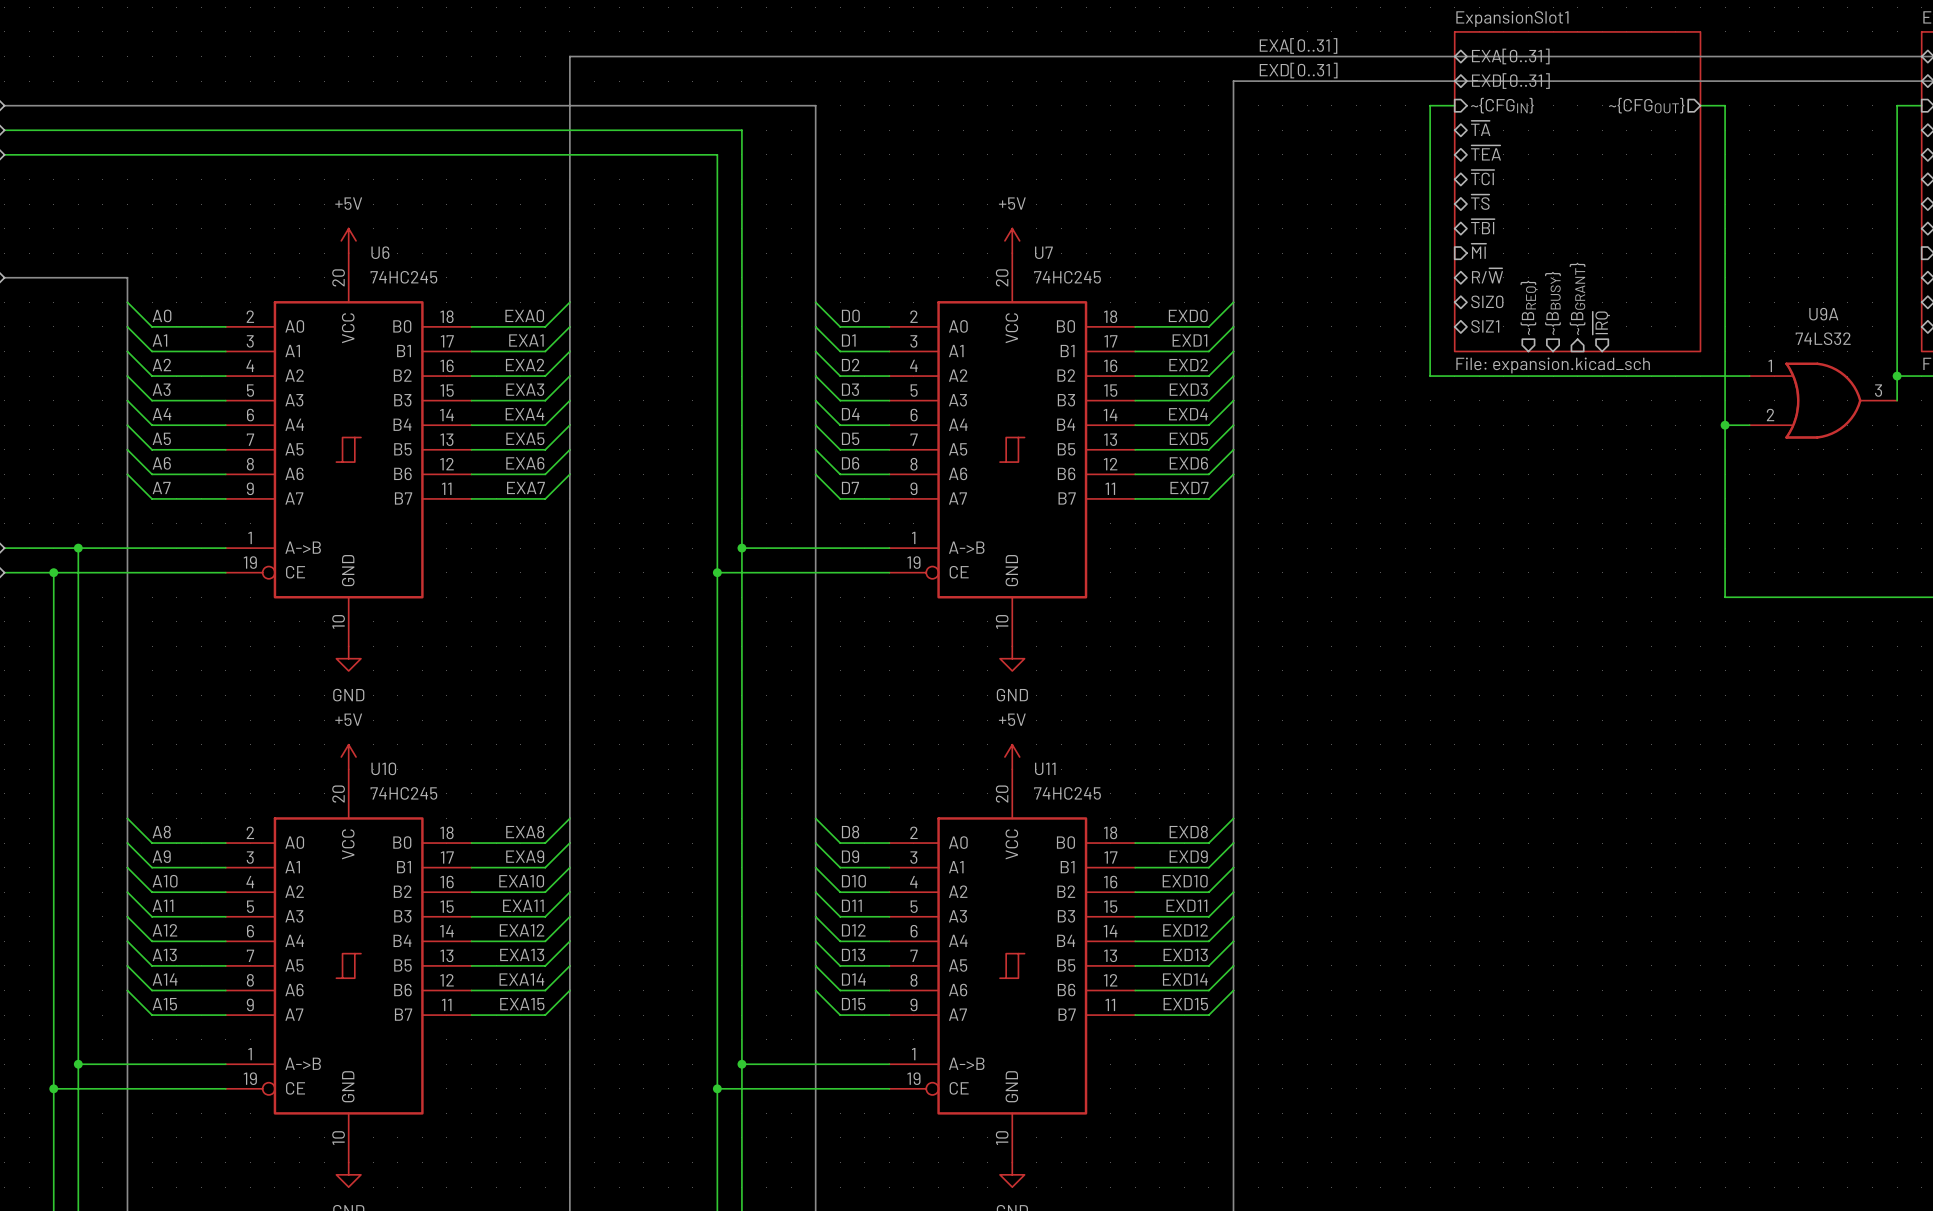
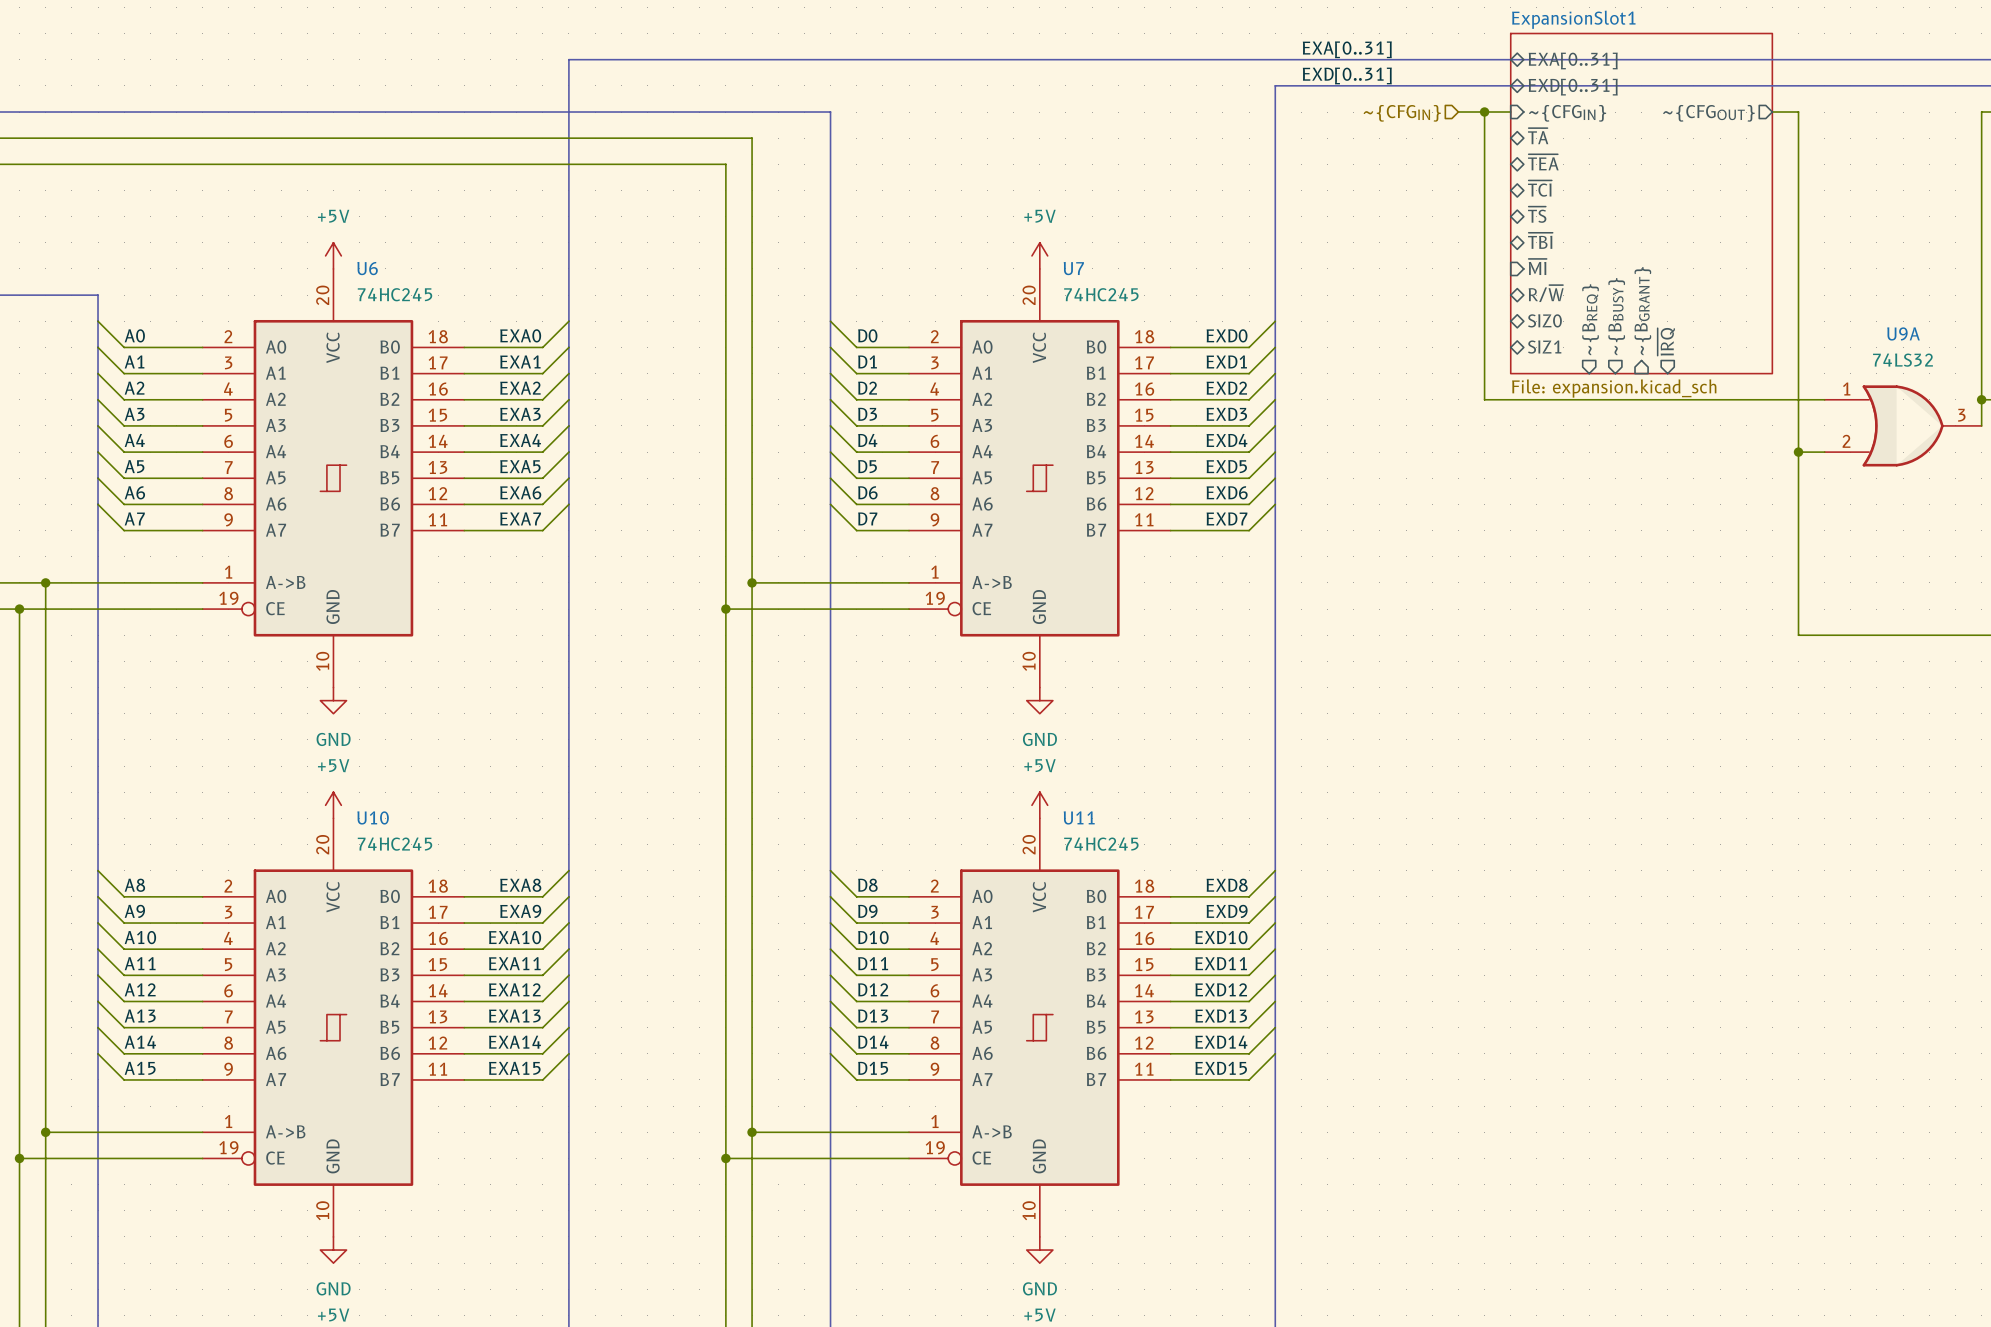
hierarchical label: none -> ~{CFGIN} (1402, 113)
wire: none -> (1458, 112) (1484, 112)
junction: none -> (1484, 112)

